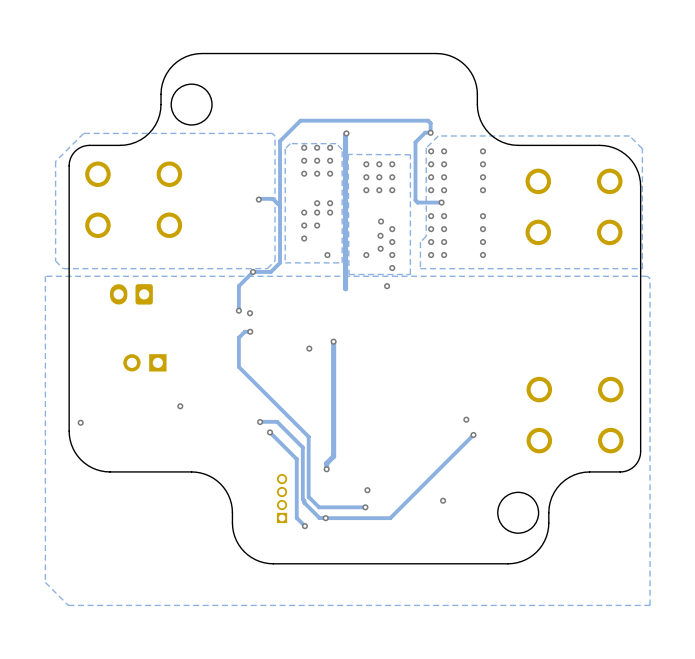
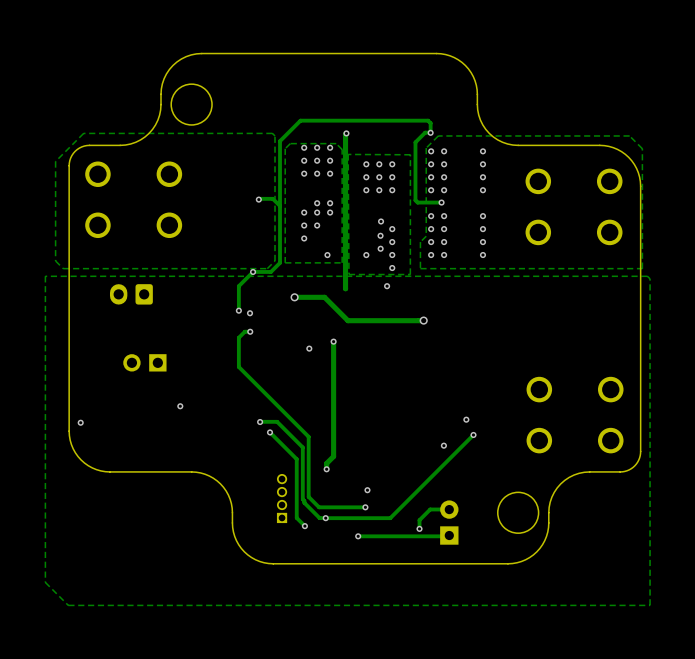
track: none -> (294, 297) (324, 297) (347, 320) (419, 320)
via: none -> (294, 297)
via: none -> (423, 320)
via: none -> (443, 445)
via: (443, 500) -> none
track: none -> (449, 509) (430, 509) (419, 520) (419, 528)
part: none -> (449, 522)
via: none -> (419, 528)
track: none -> (449, 535) (358, 536)
via: none -> (358, 536)

